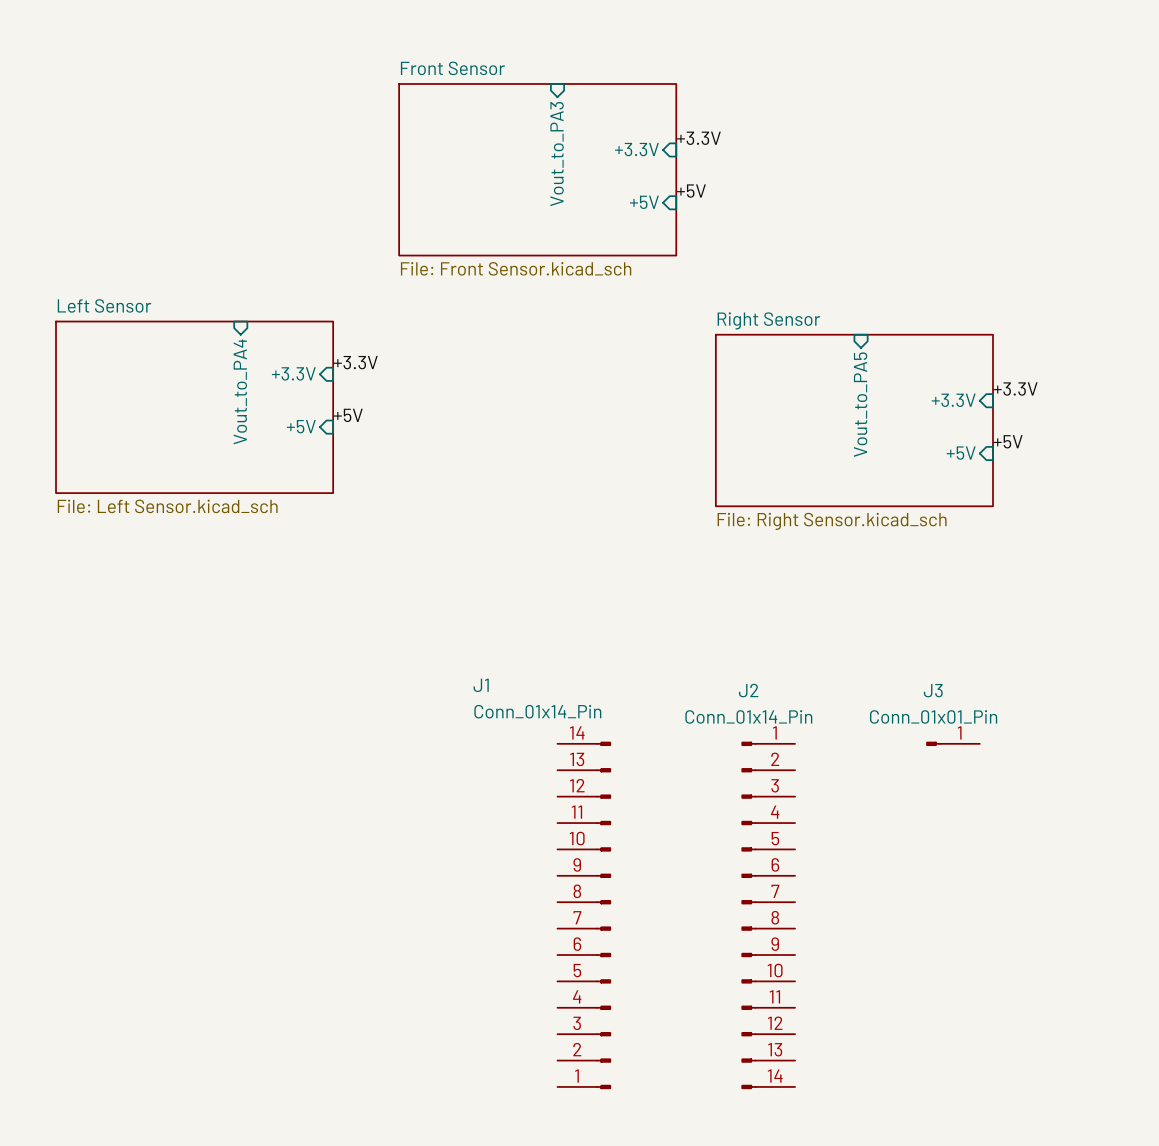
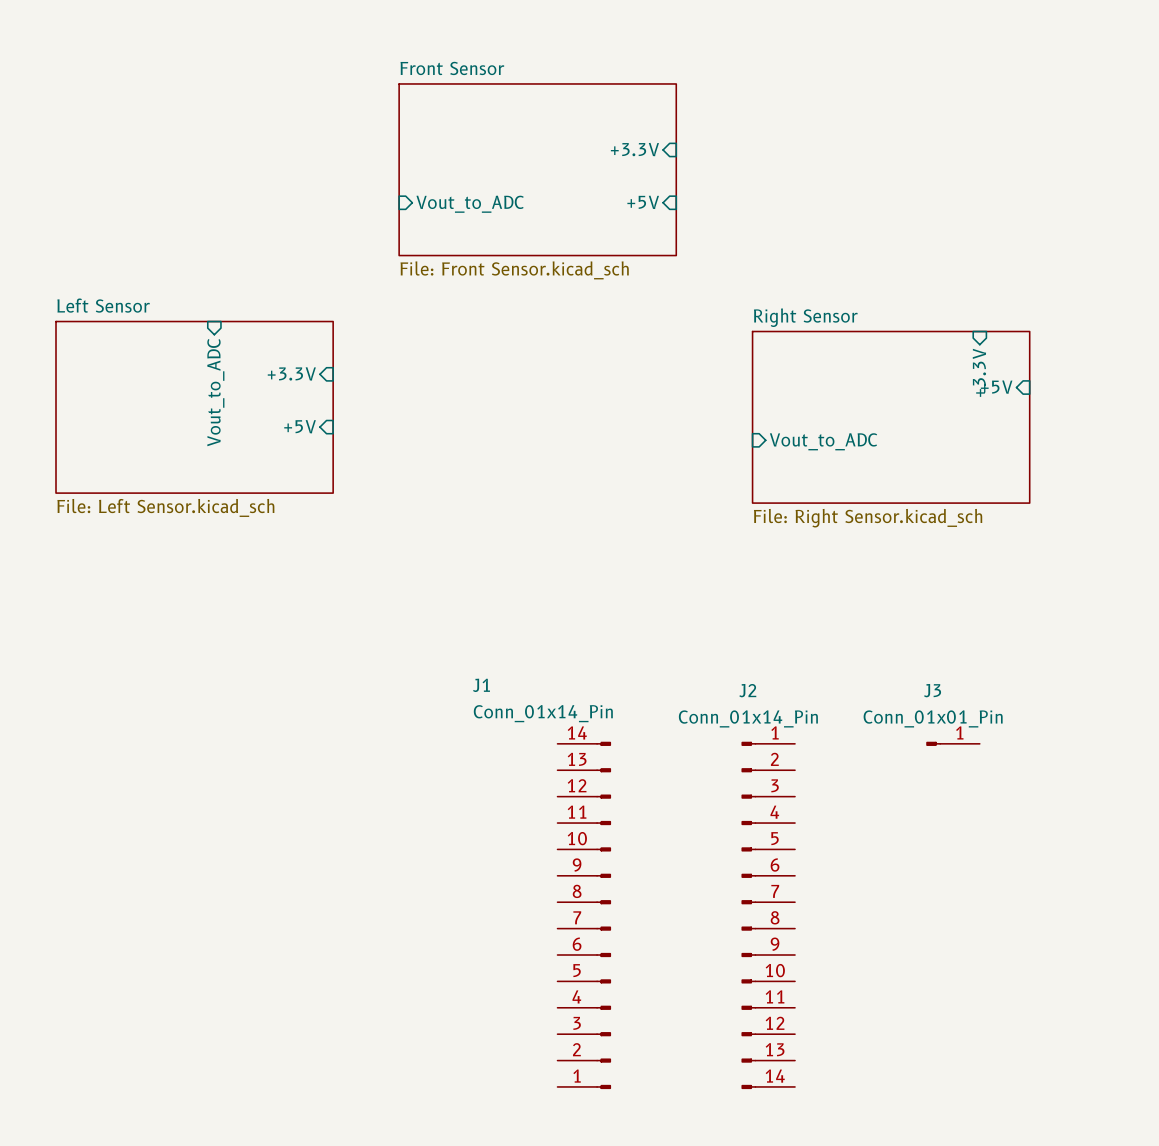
label: +3.3V (698, 138) -> none
sheet pin: Vout_to_PA3 (557, 154) -> Vout_to_ADC (470, 204)
label: +5V (691, 191) -> none
label: +3.3V (355, 362) -> none
label: +3.3V (1015, 389) -> none
sheet pin: Vout_to_PA4 (240, 391) -> Vout_to_ADC (215, 392)
sheet pin rotation: 0° (953, 400) -> 90° counterclockwise (979, 372)
sheet pin: Vout_to_PA5 (860, 404) -> Vout_to_ADC (823, 441)
label: +5V (348, 415) -> none
sheet Right Sensor position: (854, 420) -> (891, 417)
label: +5V (1008, 441) -> none
sheet pin position: +5V (961, 453) -> +5V (996, 387)

